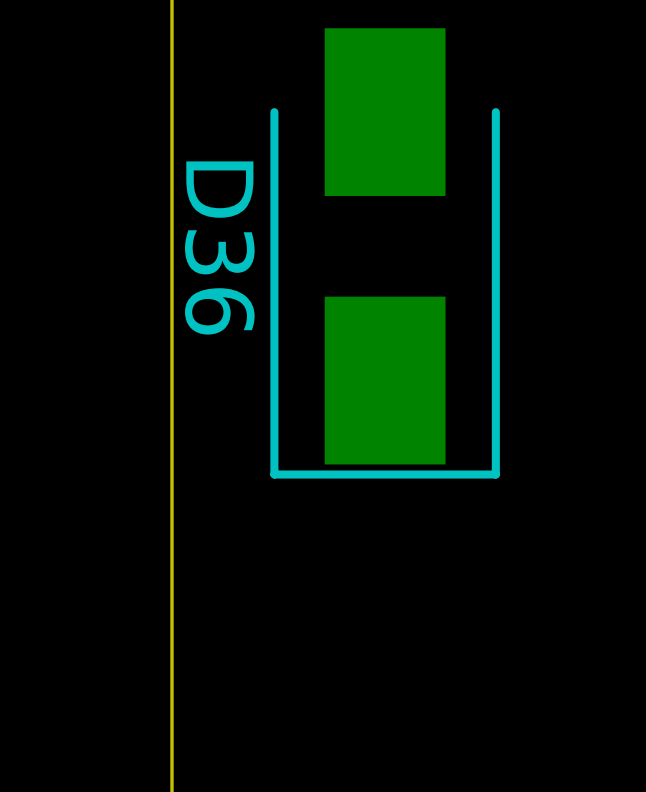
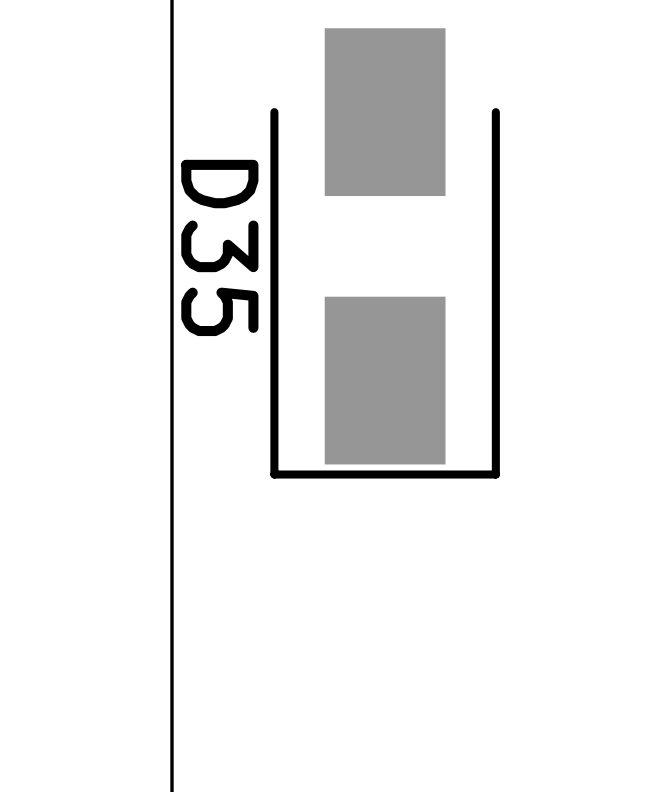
D36 name: D36 (219, 247) -> D35 (219, 247)

